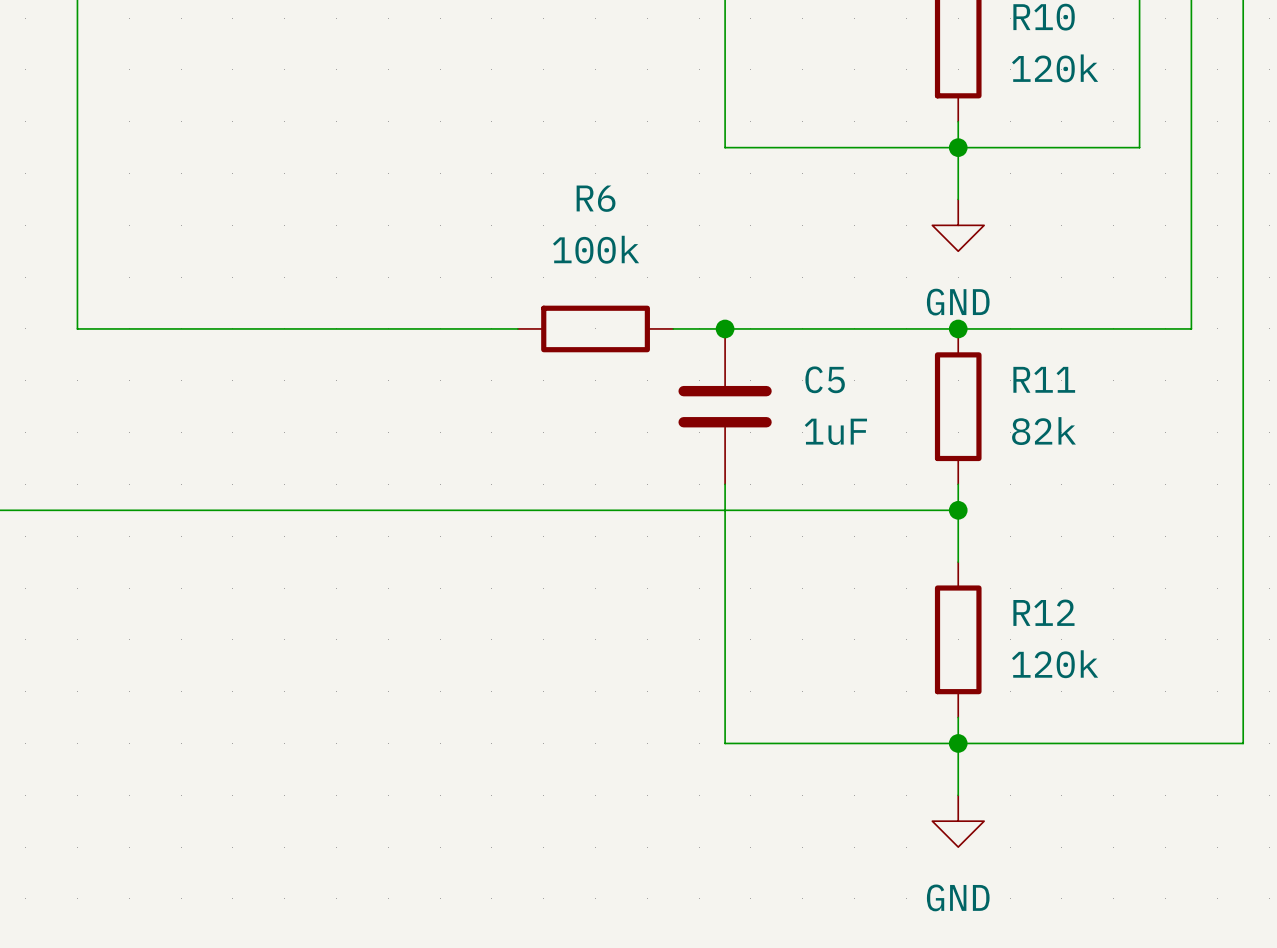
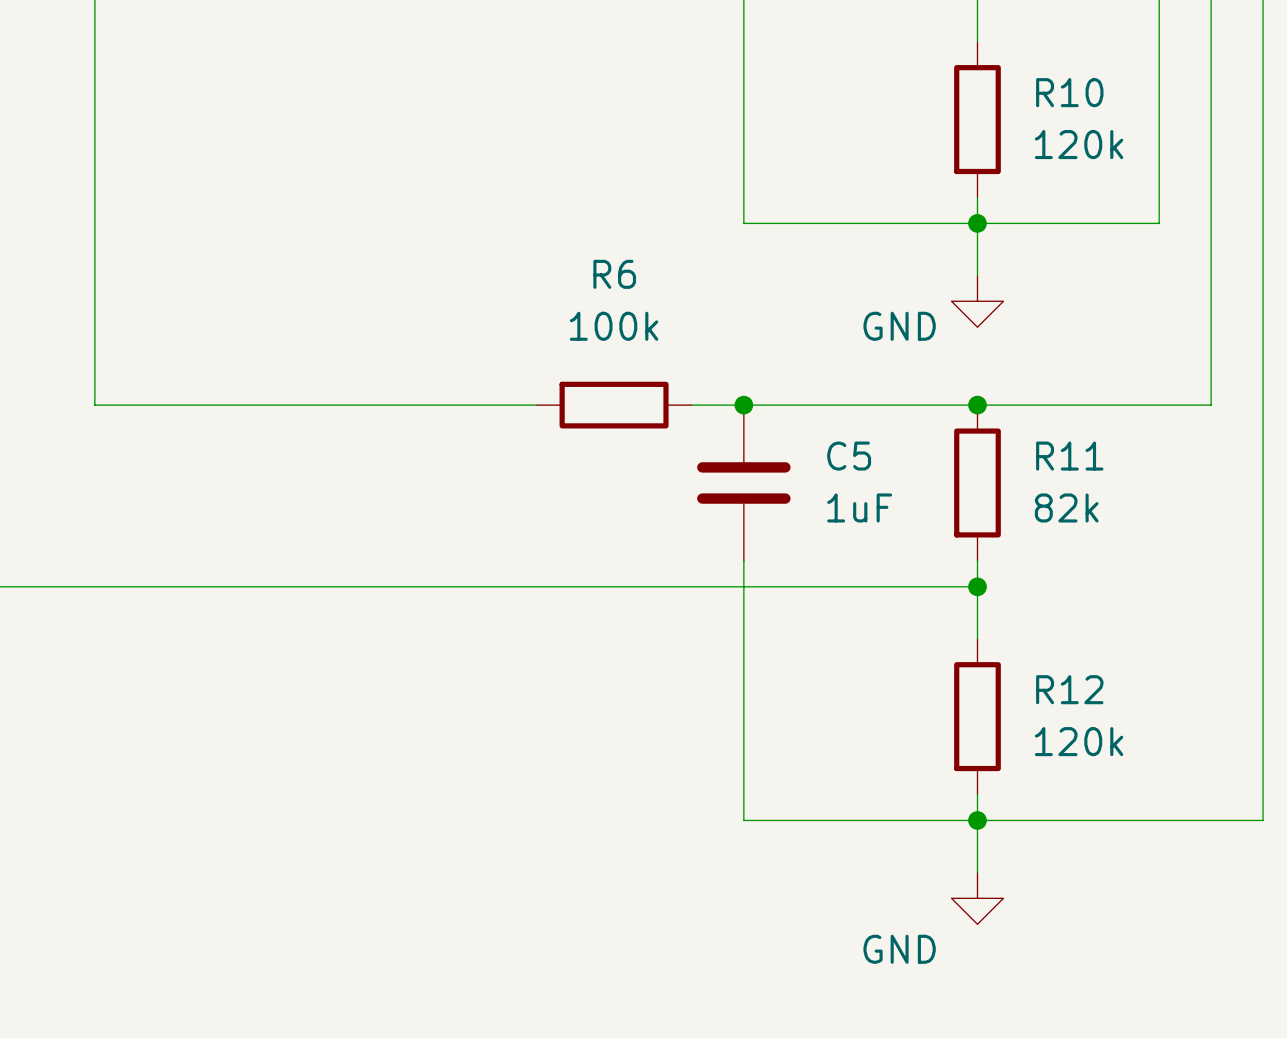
power symbol text position: GND (958, 302) -> GND (899, 326)
power symbol text position: GND (958, 897) -> GND (899, 949)

